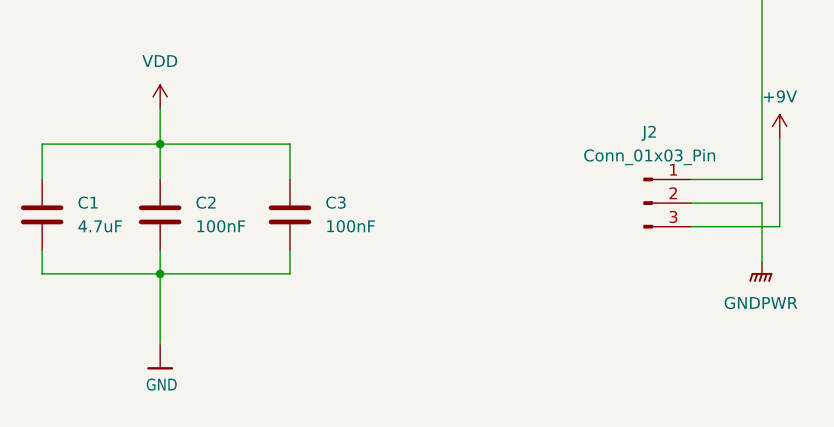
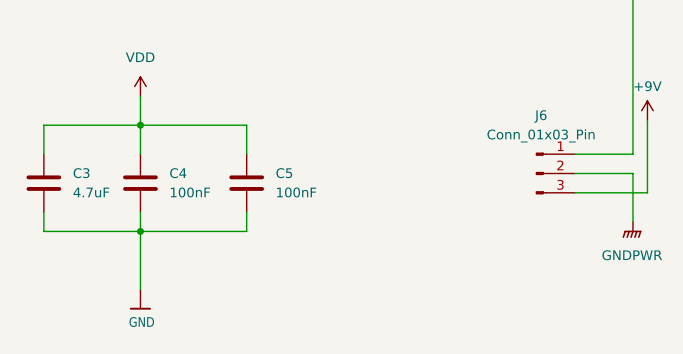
J2 name: J2 (648, 133) -> J6 (540, 116)
C1 name: C1 (88, 202) -> C3 (81, 173)
C2 name: C2 (206, 202) -> C4 (178, 173)
C3 name: C3 (335, 202) -> C5 (284, 173)

